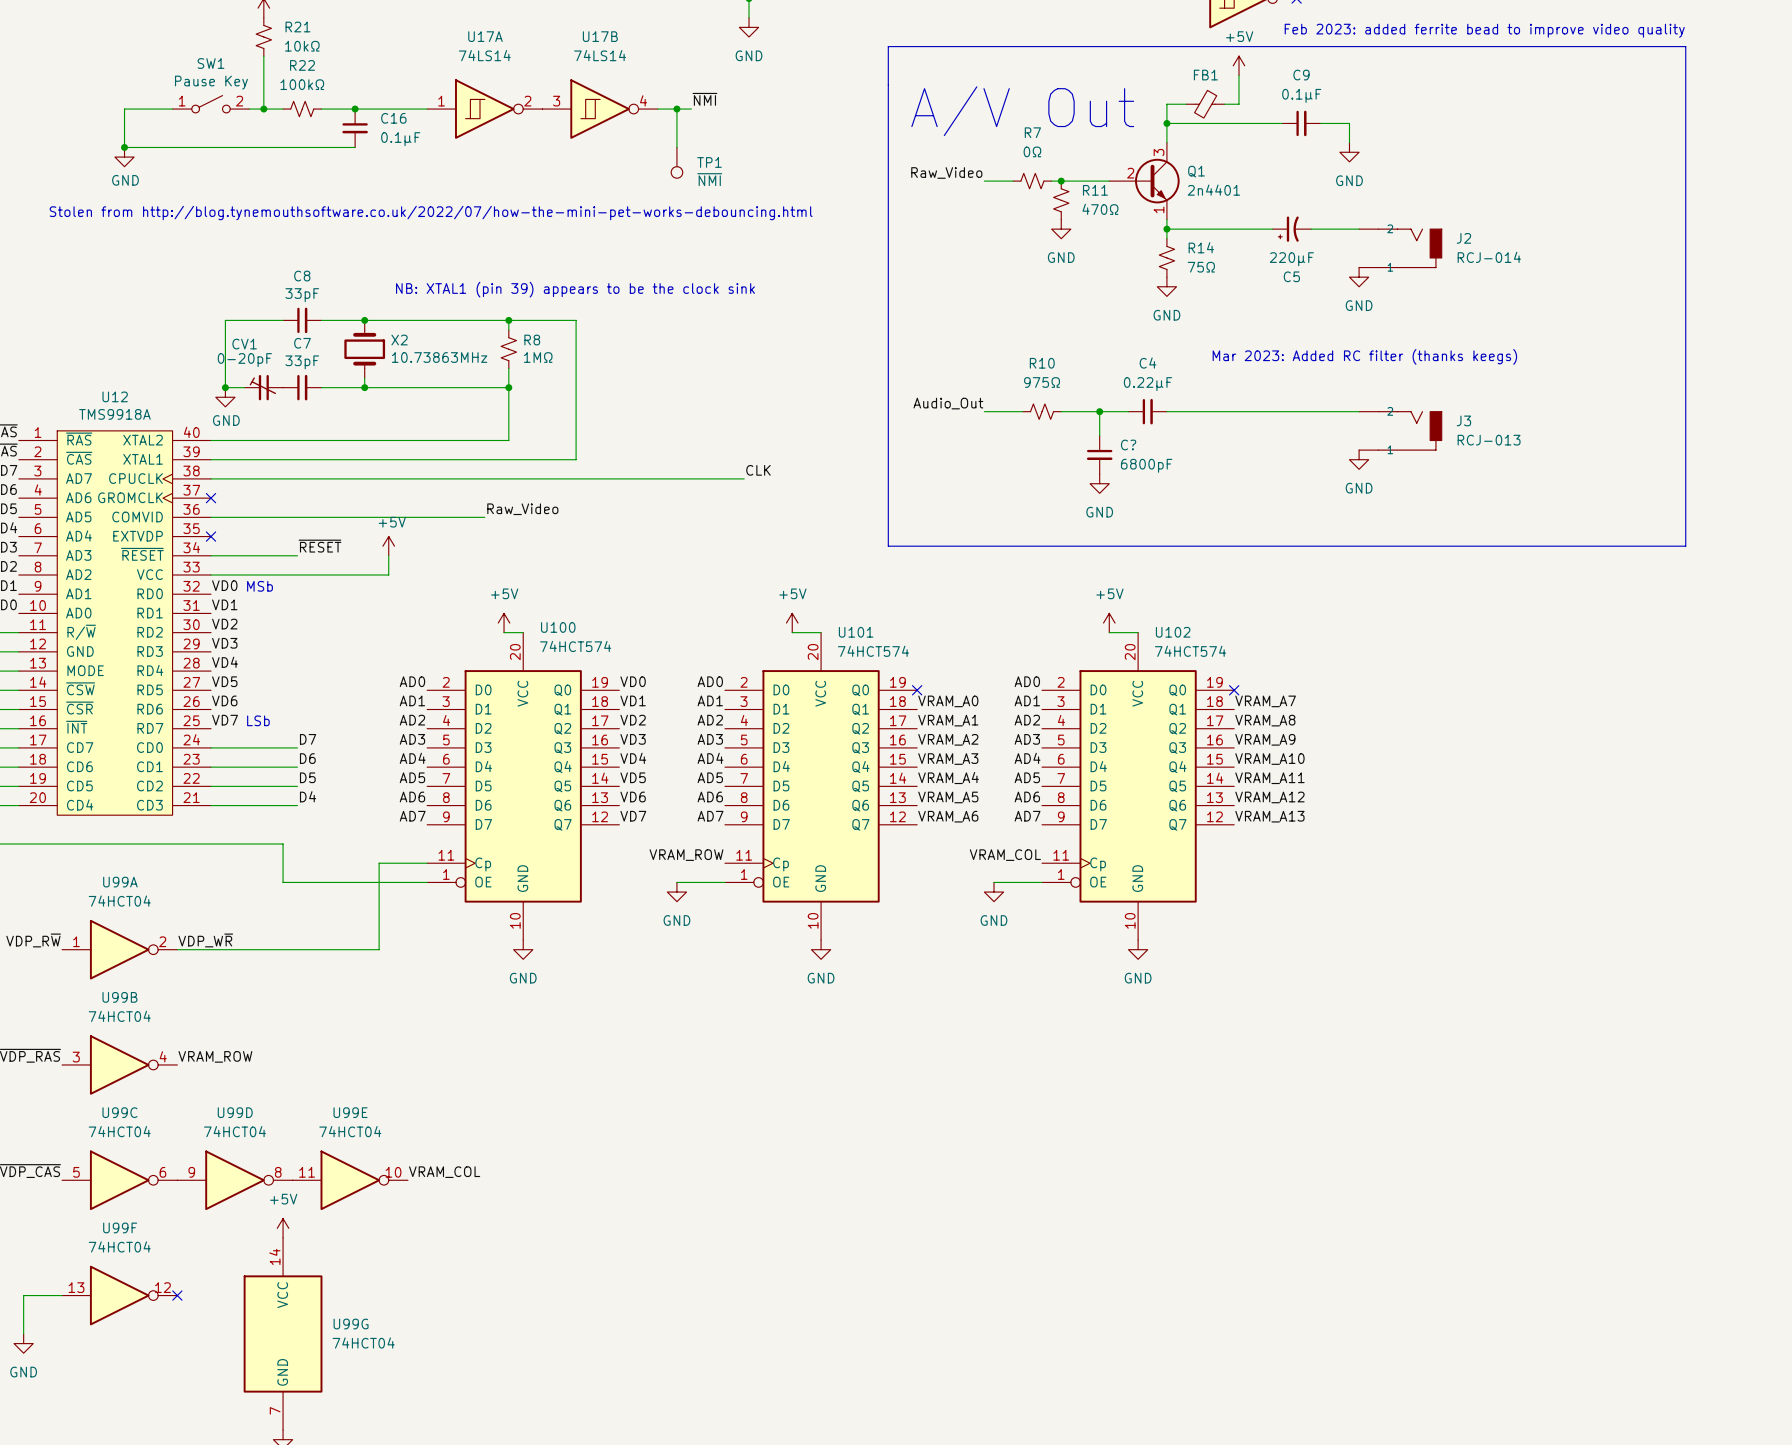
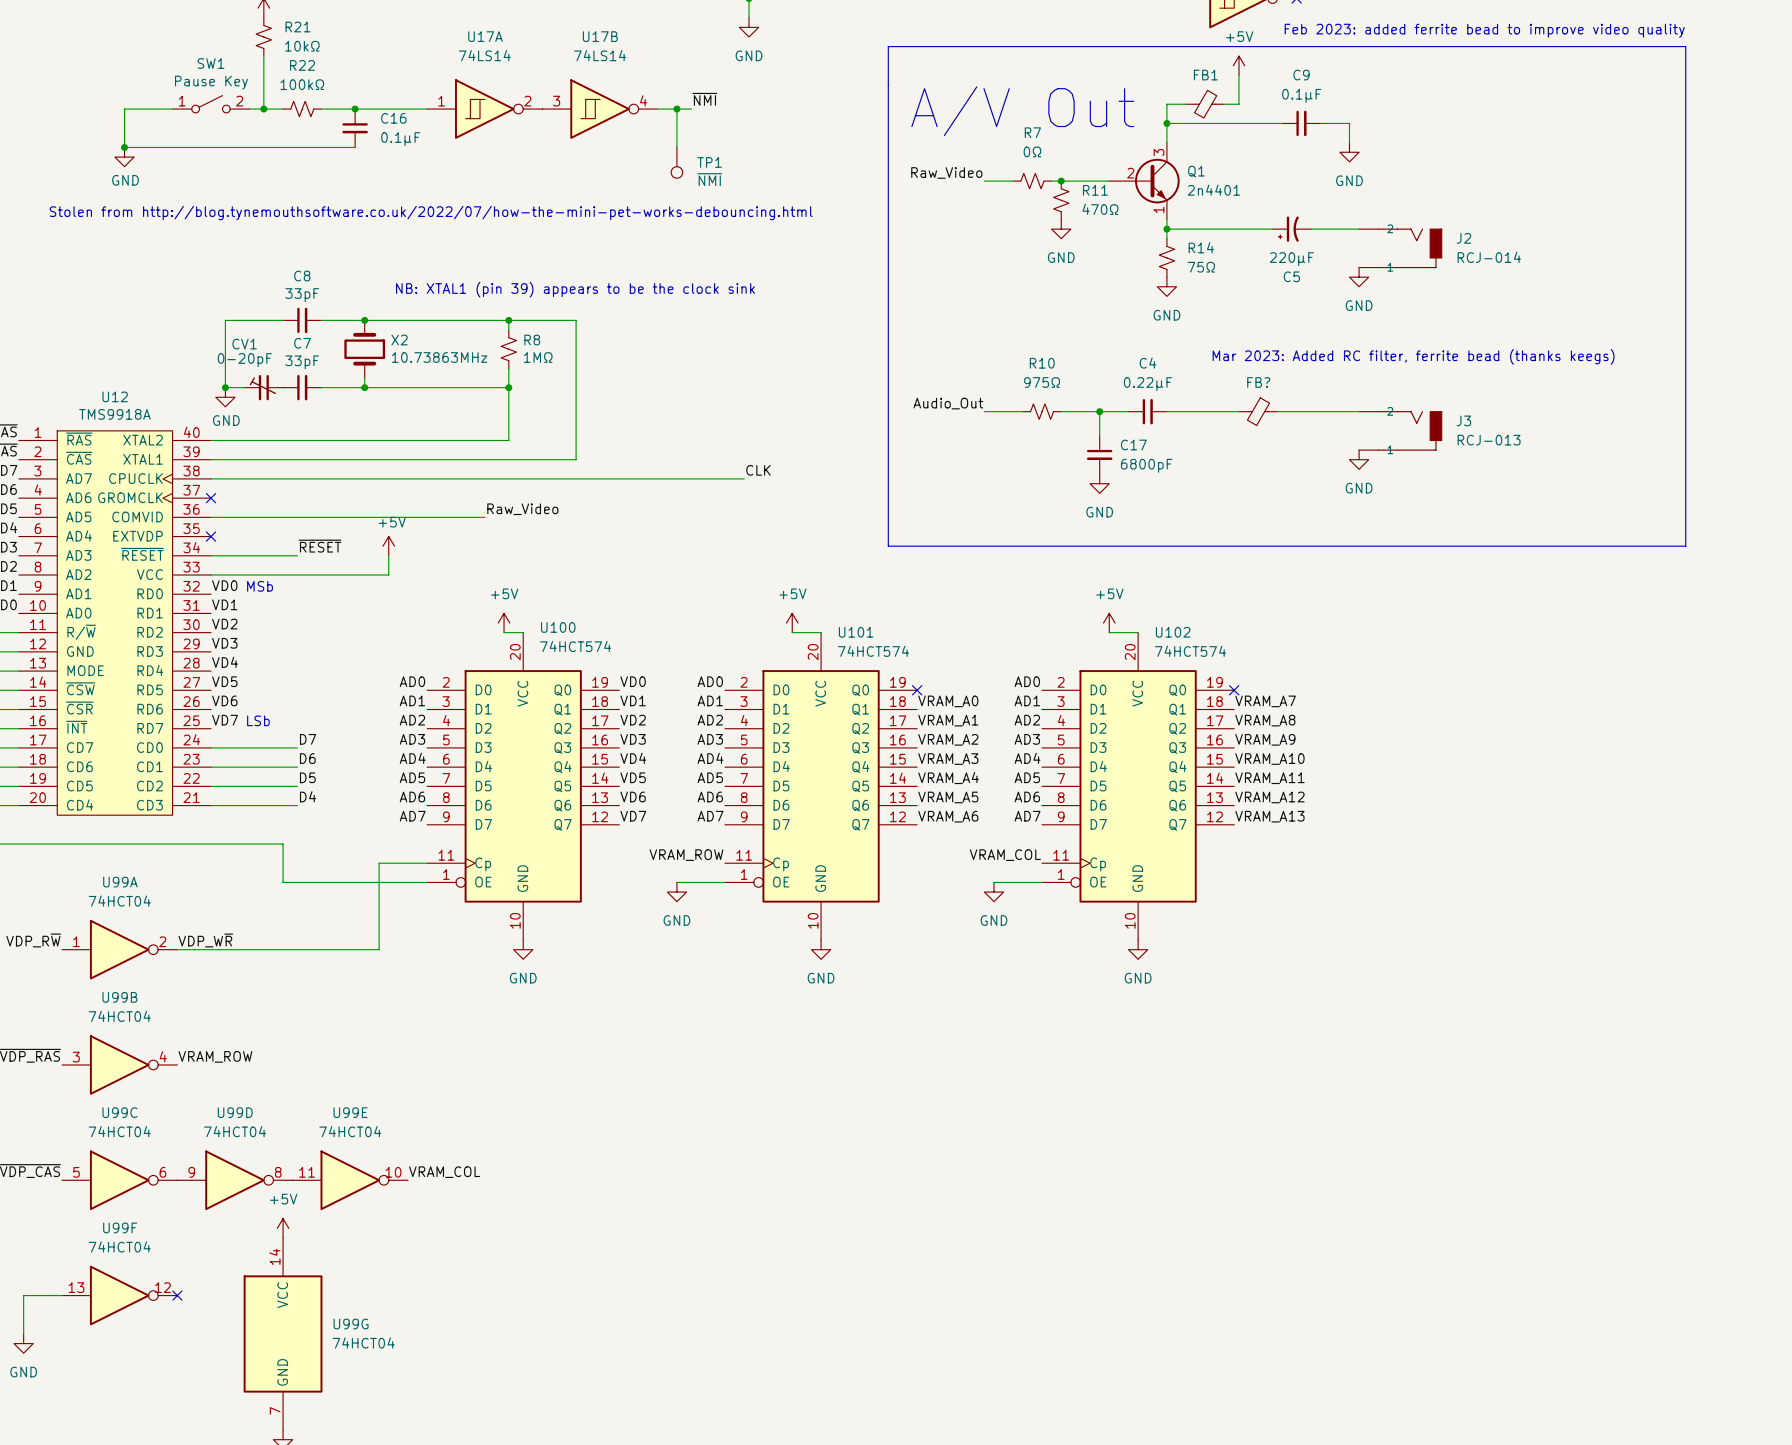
text: Mar 2023: Added RC filter (thanks keegs) (1364, 356) -> Mar 2023: Added RC filter, ferrite bead (thanks keegs) (1413, 356)
FB?: none -> (1258, 411)
C? name: C? (1128, 444) -> C17 (1133, 444)

